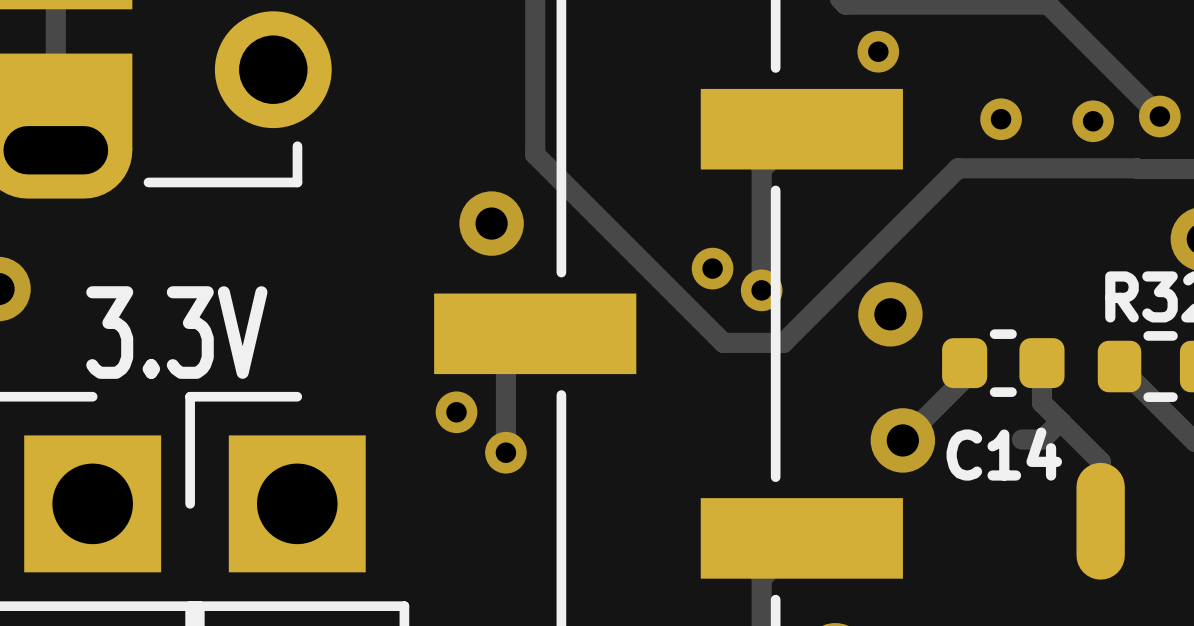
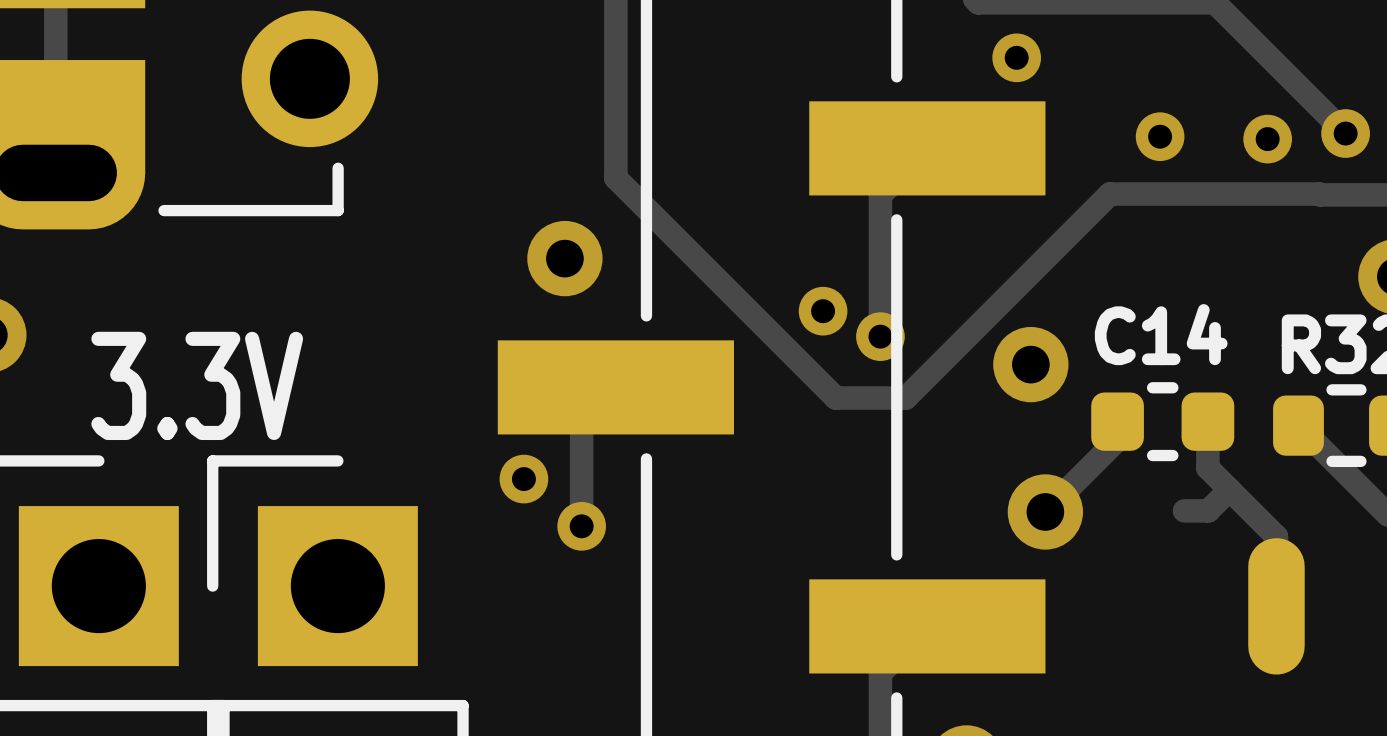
C14 name position: C14 (1004, 454) -> C14 (1161, 334)

